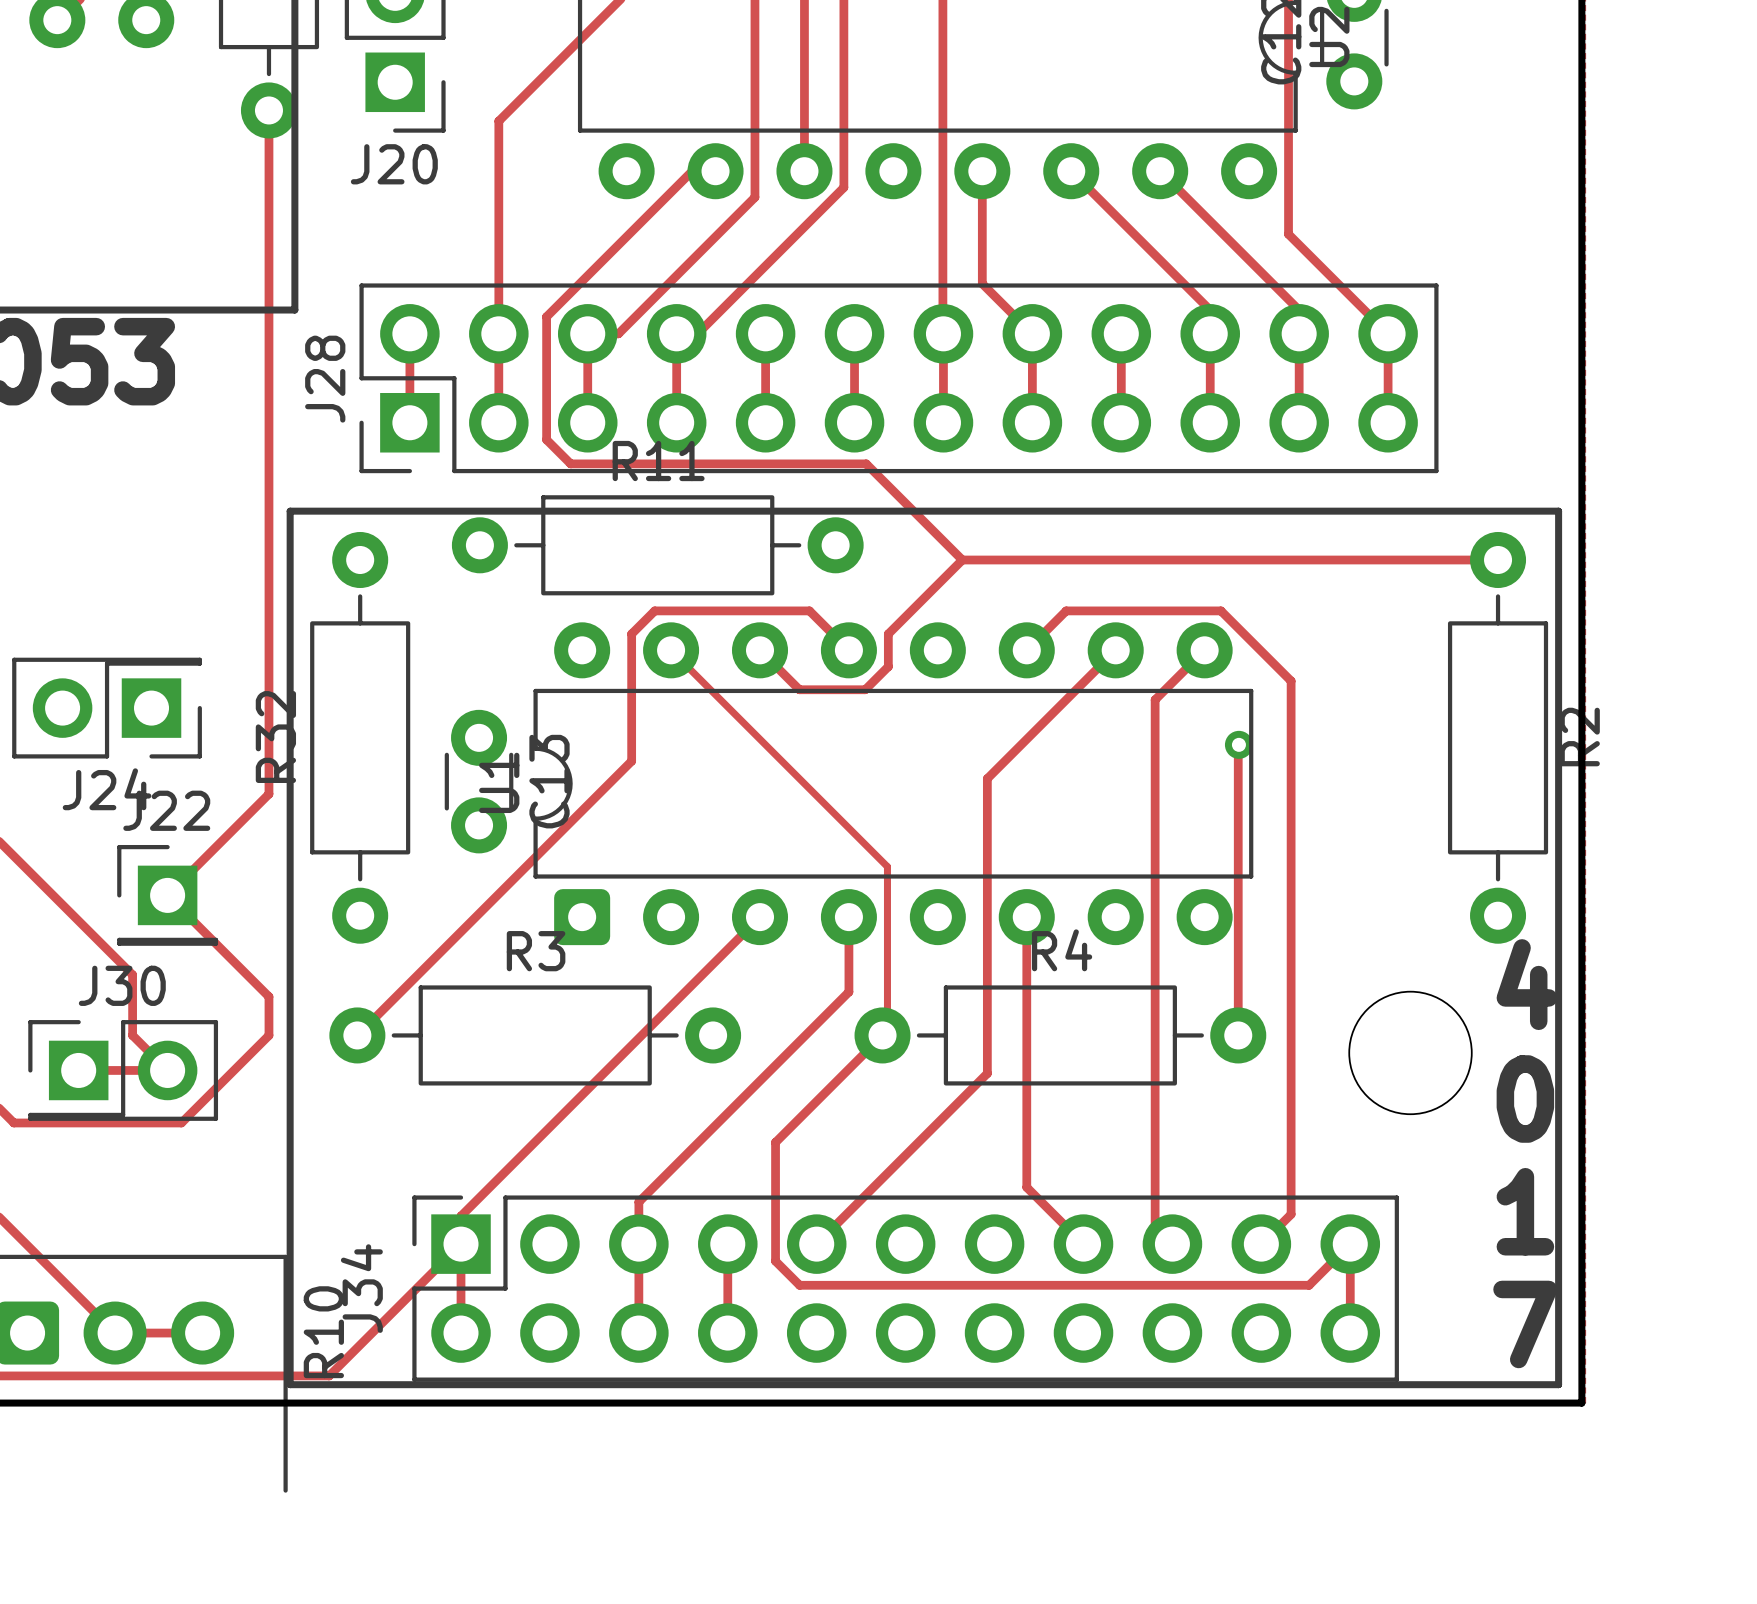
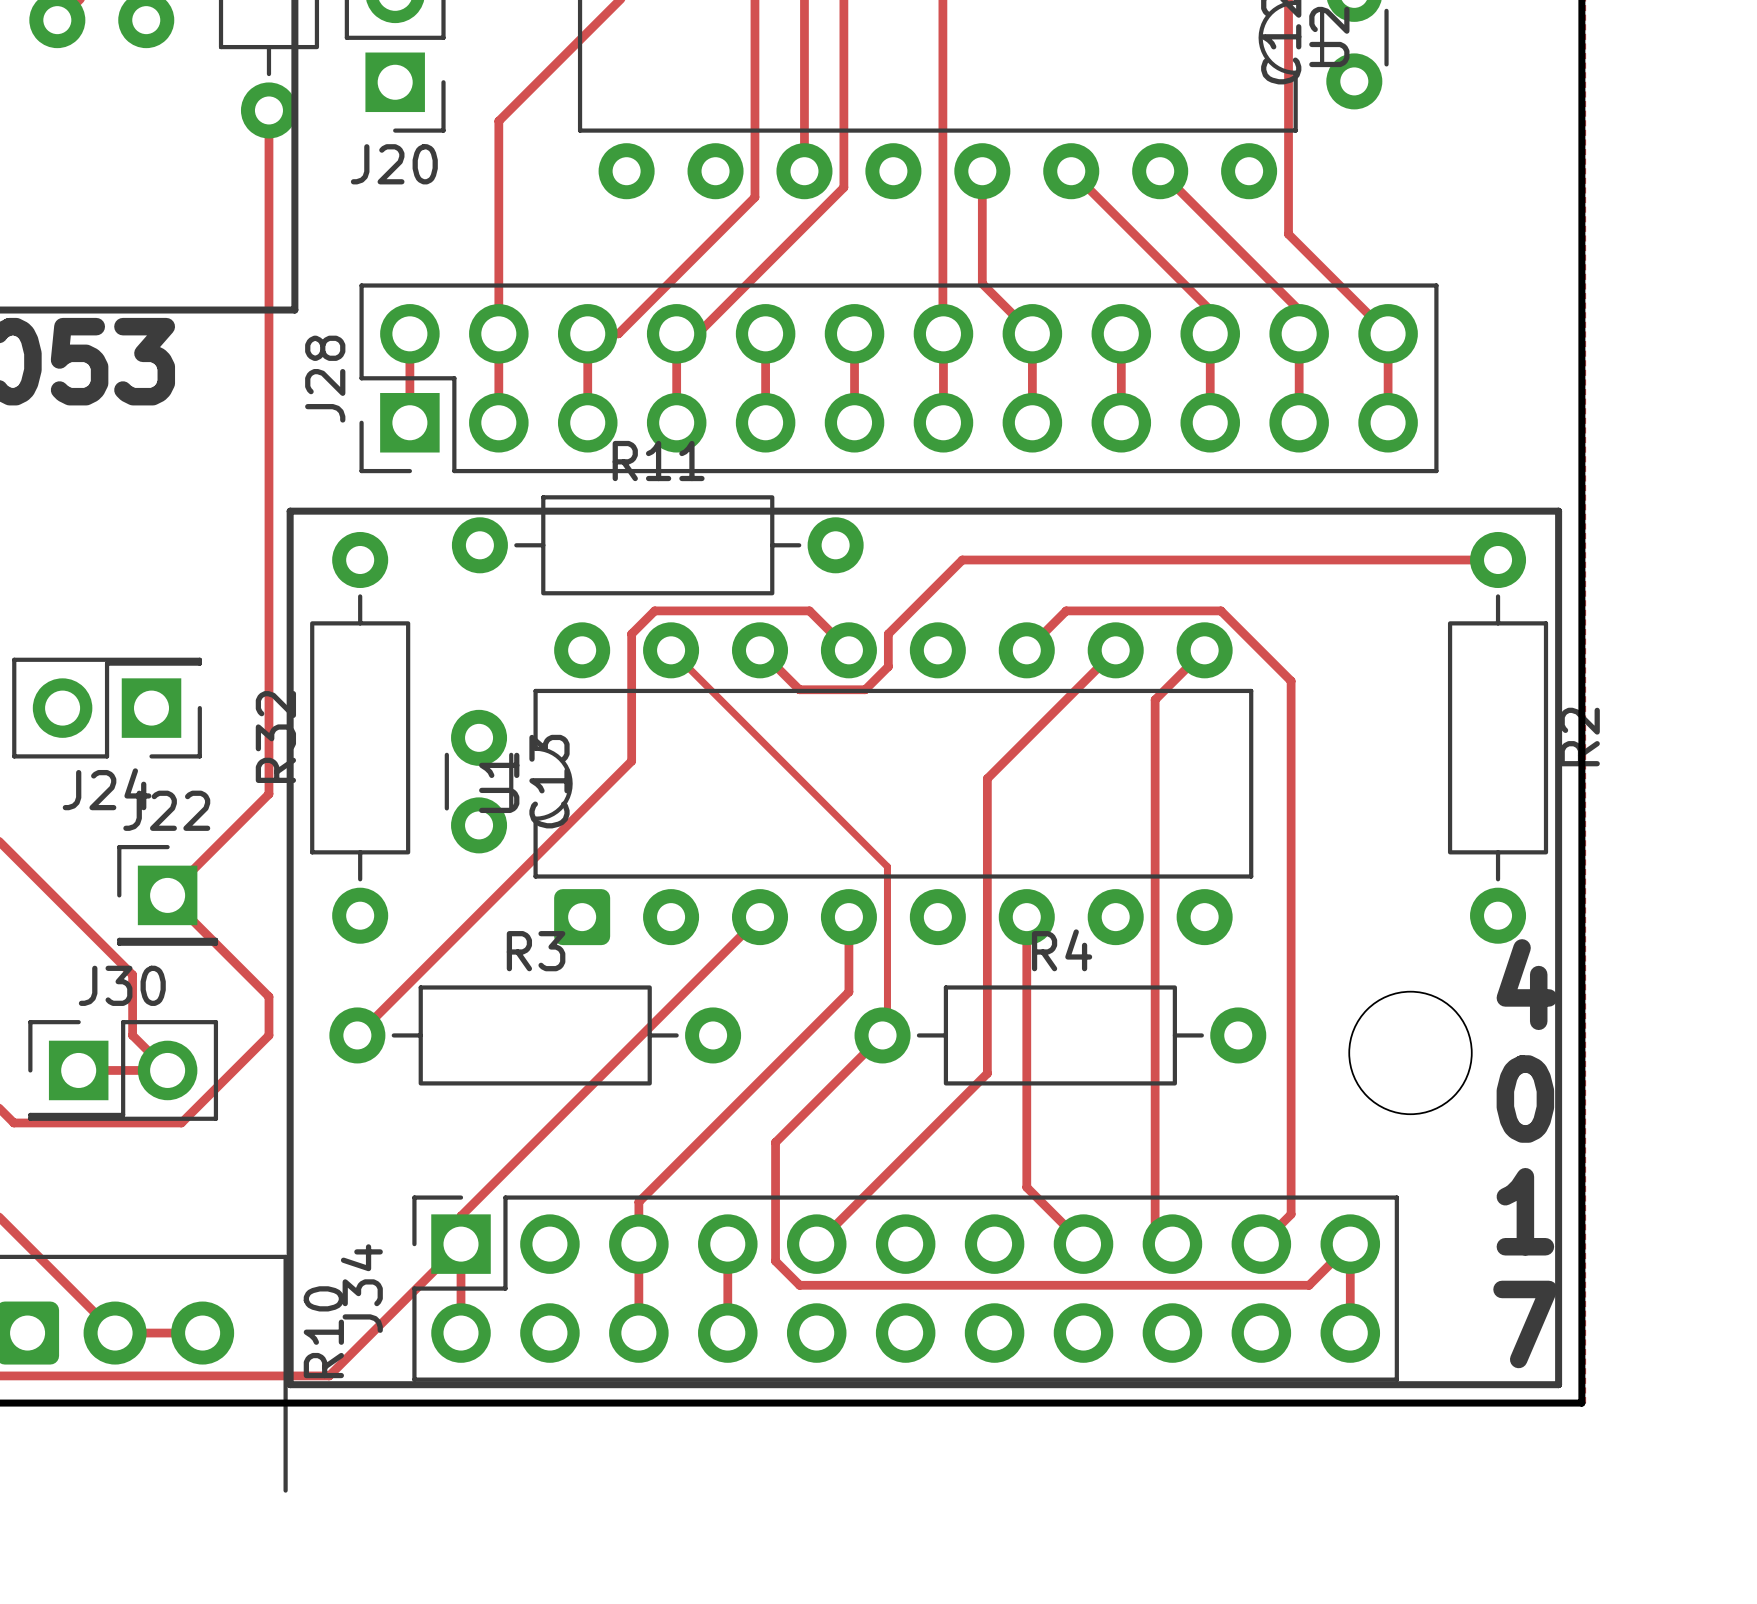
track: (715, 171) (692, 171) (546, 316) (546, 439) (570, 463) (866, 463) (962, 560) -> none
track: (1238, 744) (1238, 1035) -> none
via: (1238, 744) -> none

